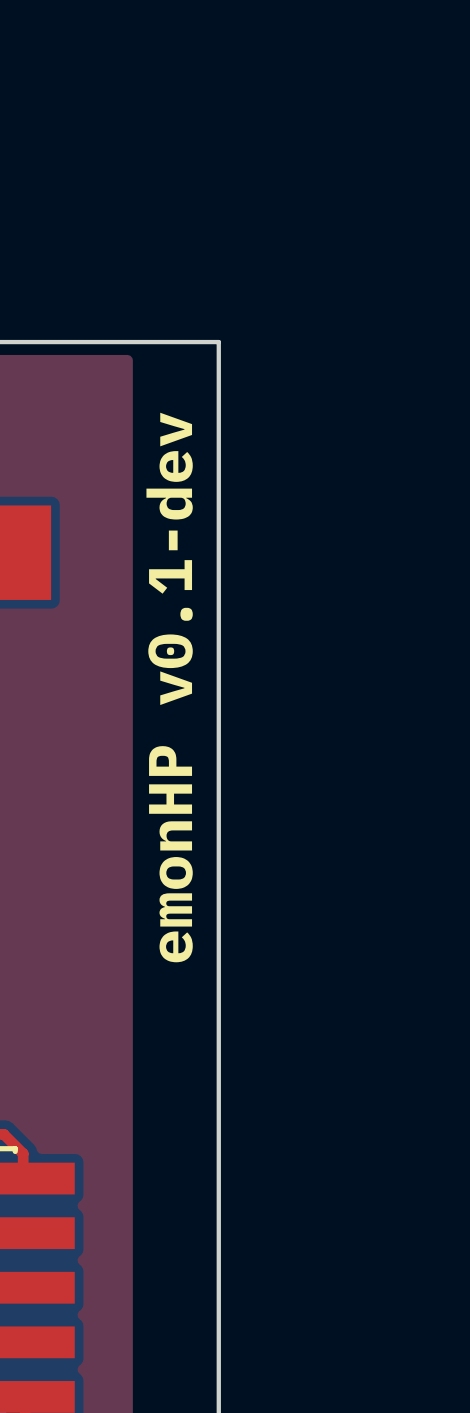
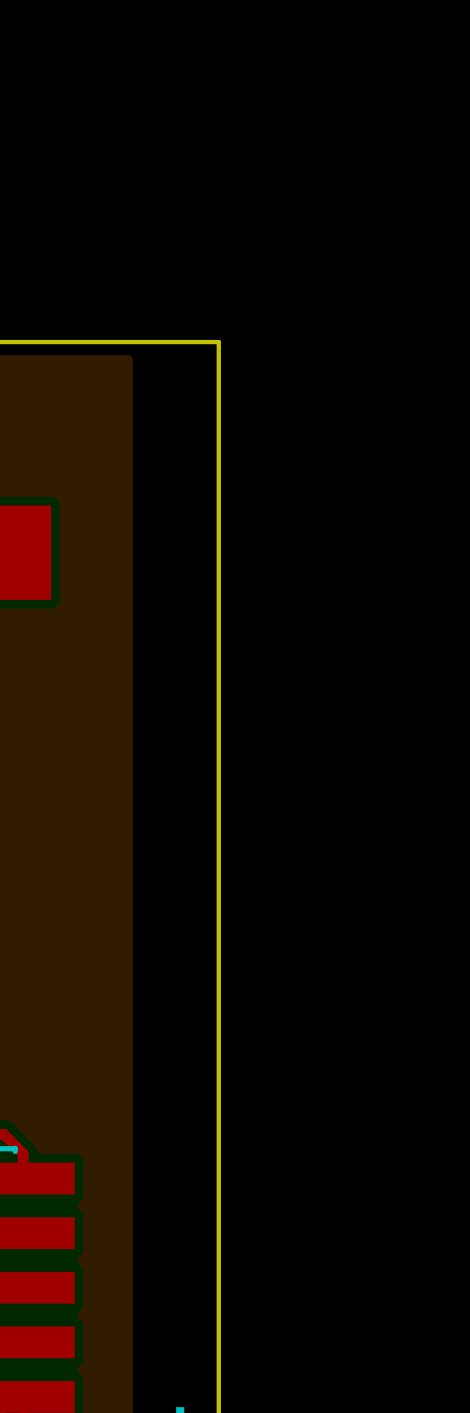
text: emonHP v0.1-dev (169, 687) -> none

